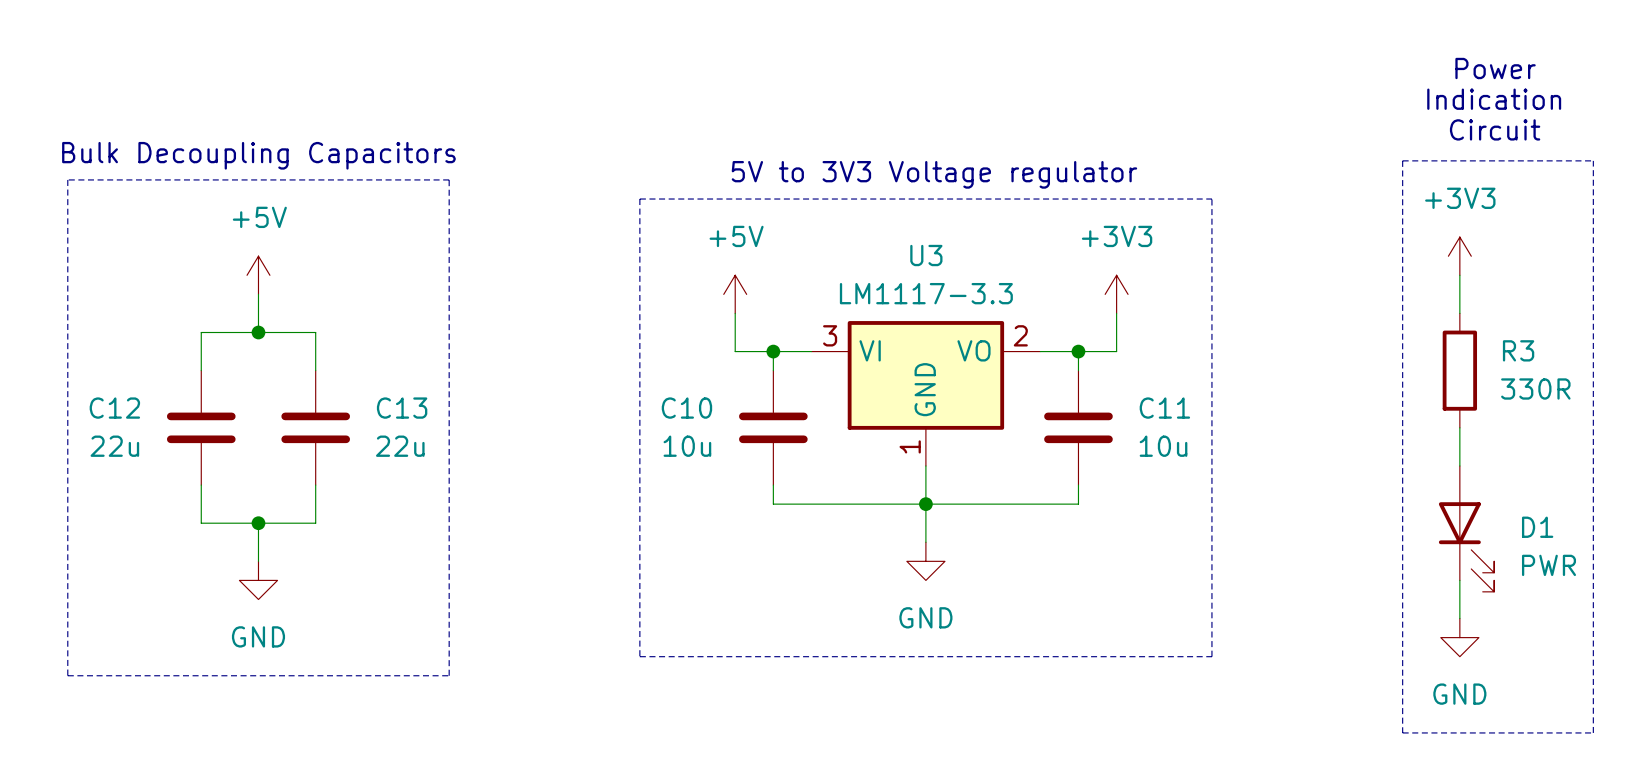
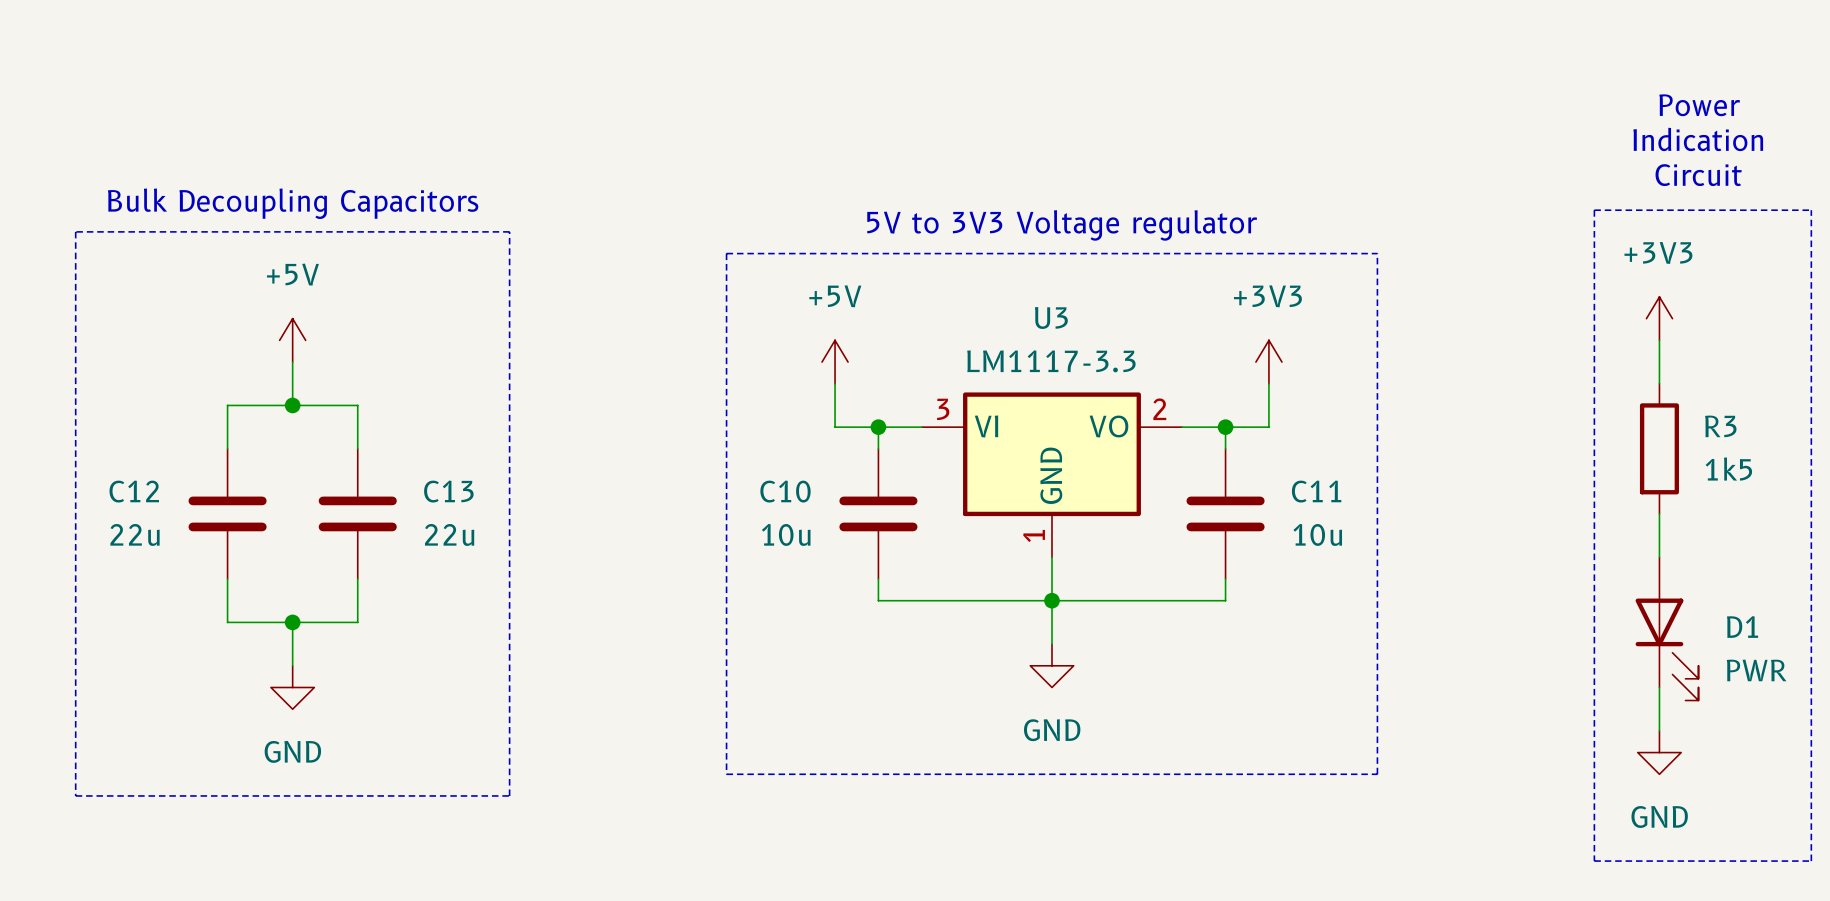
R3 value: 330R (1535, 388) -> 1k5 (1728, 469)

